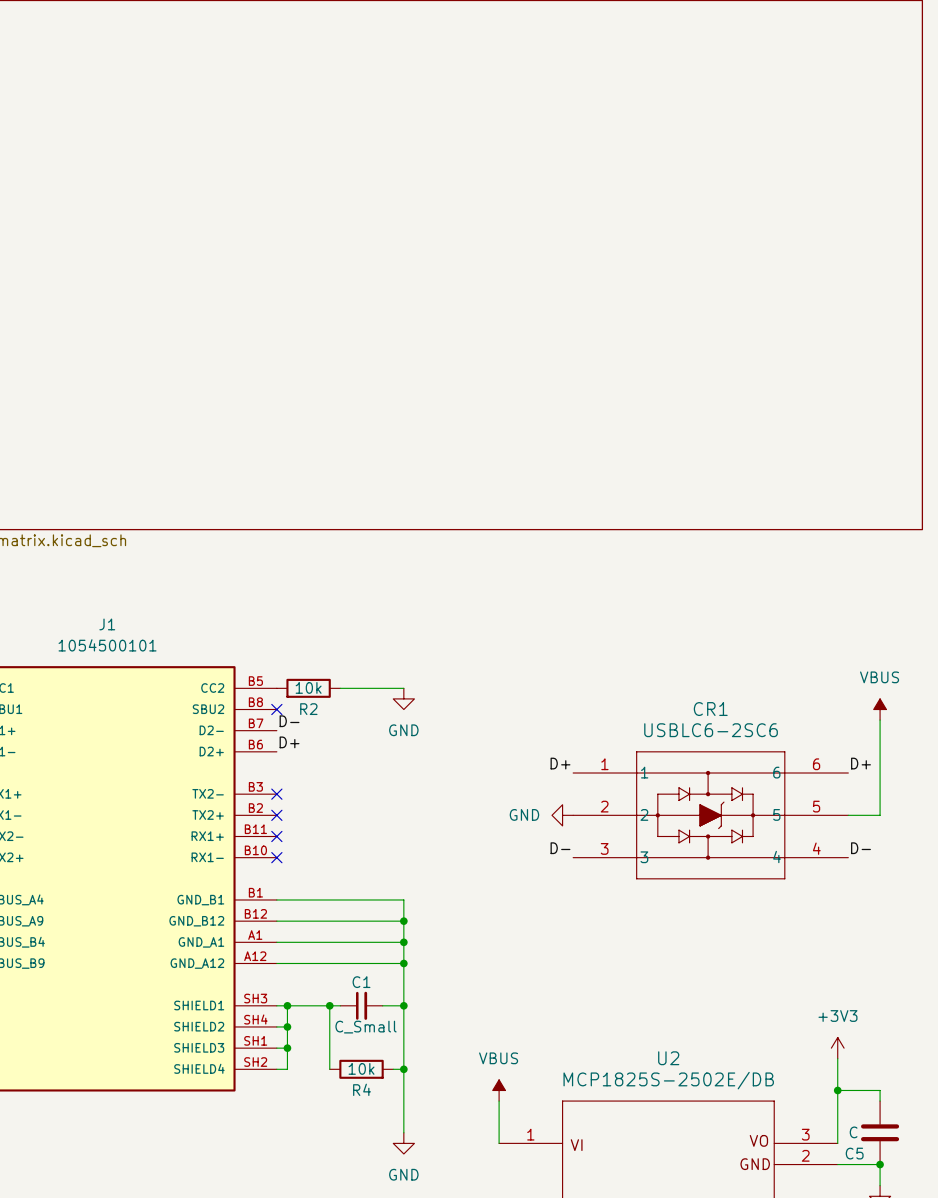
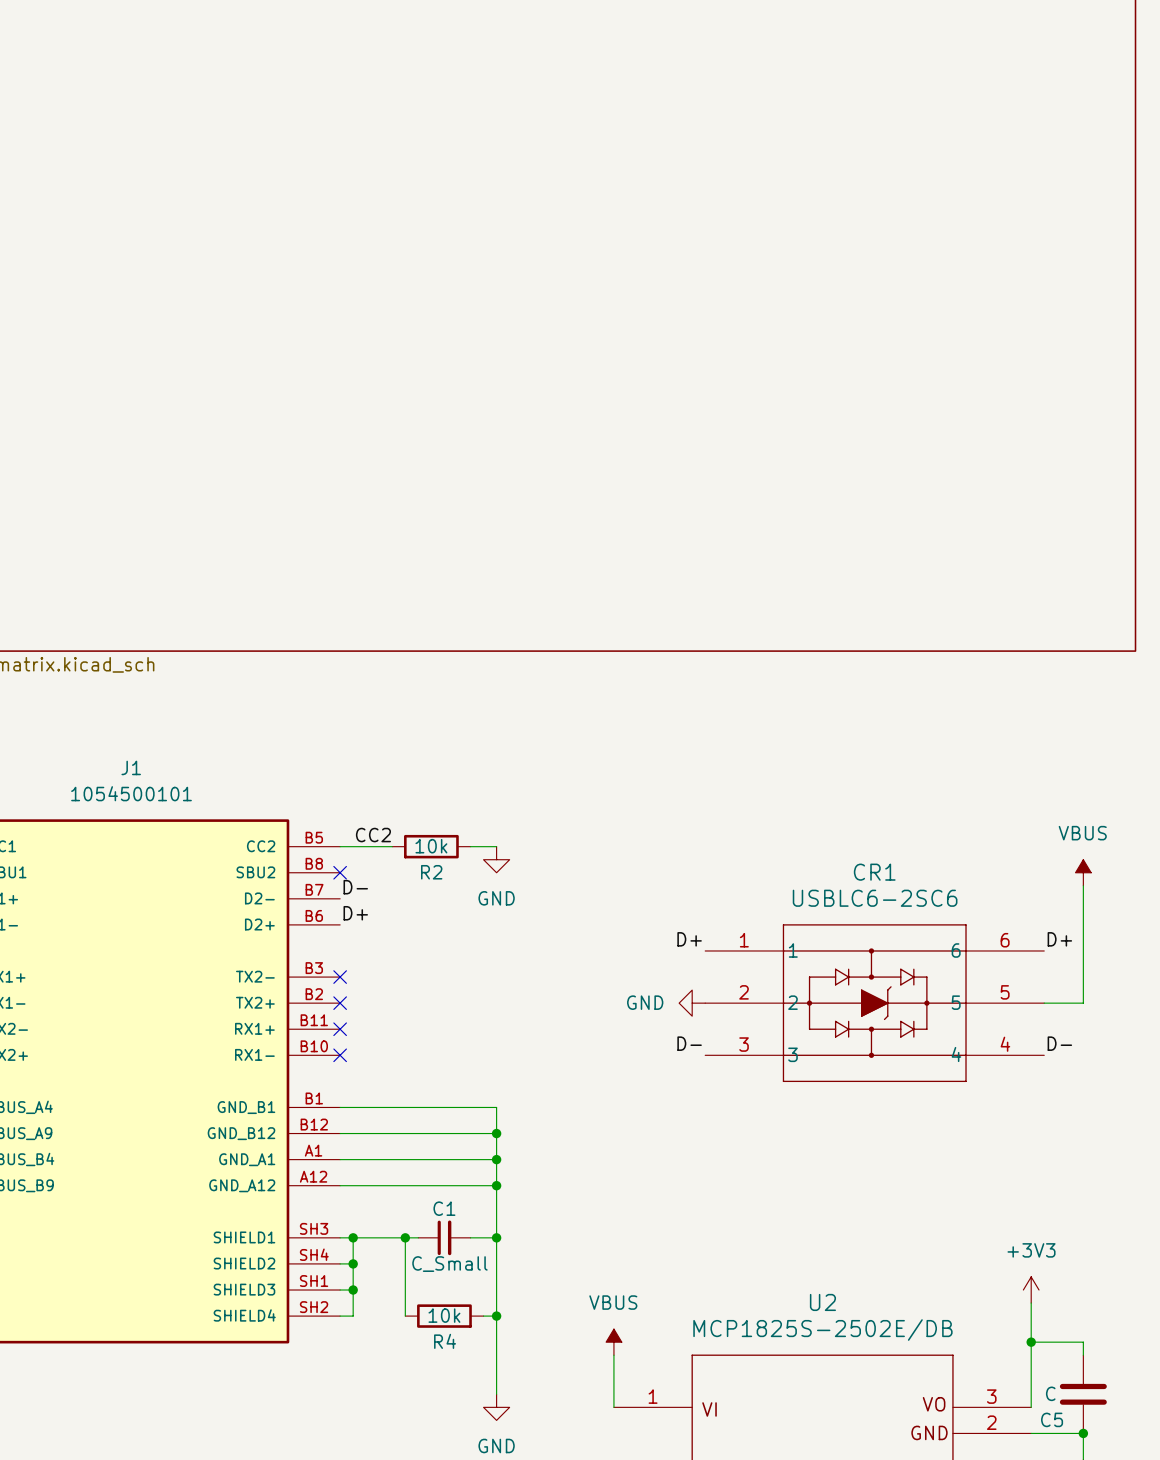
label: none -> CC2 (373, 835)
R2 position: (308, 688) -> (431, 846)
wire: (340, 688) (382, 688) -> (340, 846) (392, 846)

